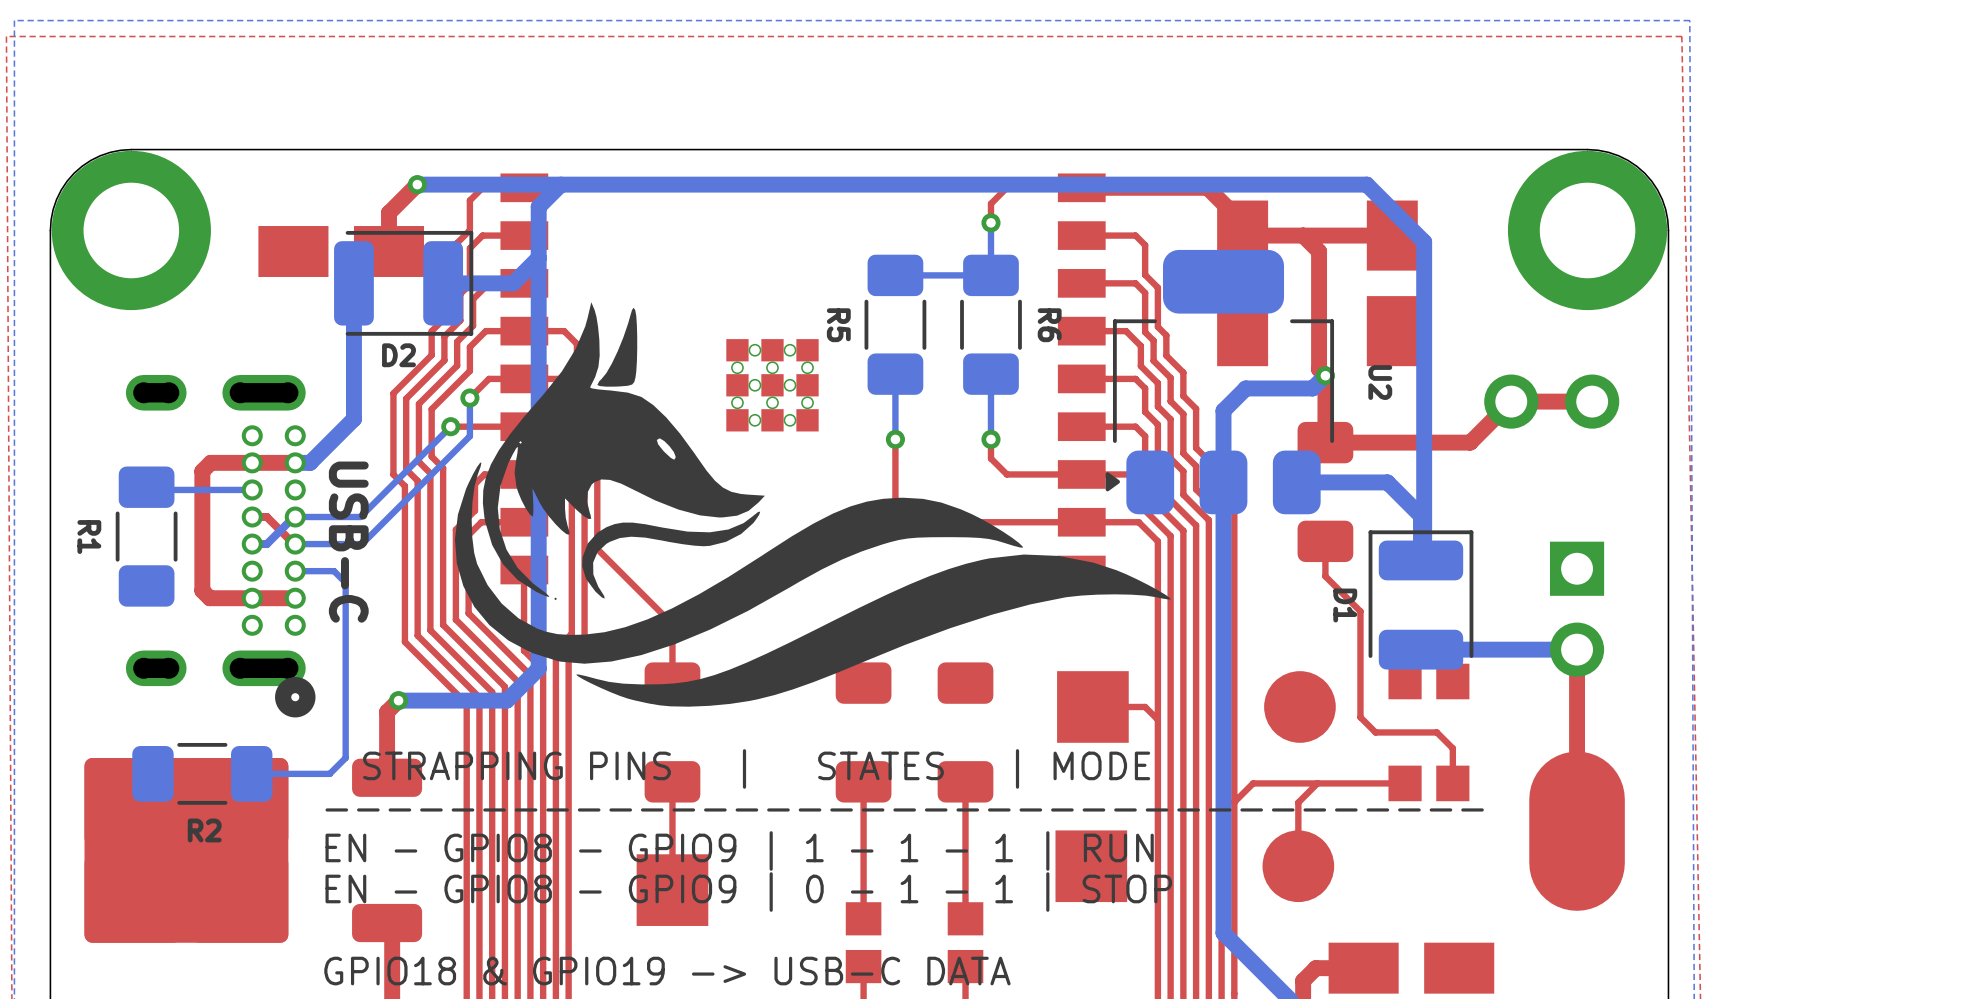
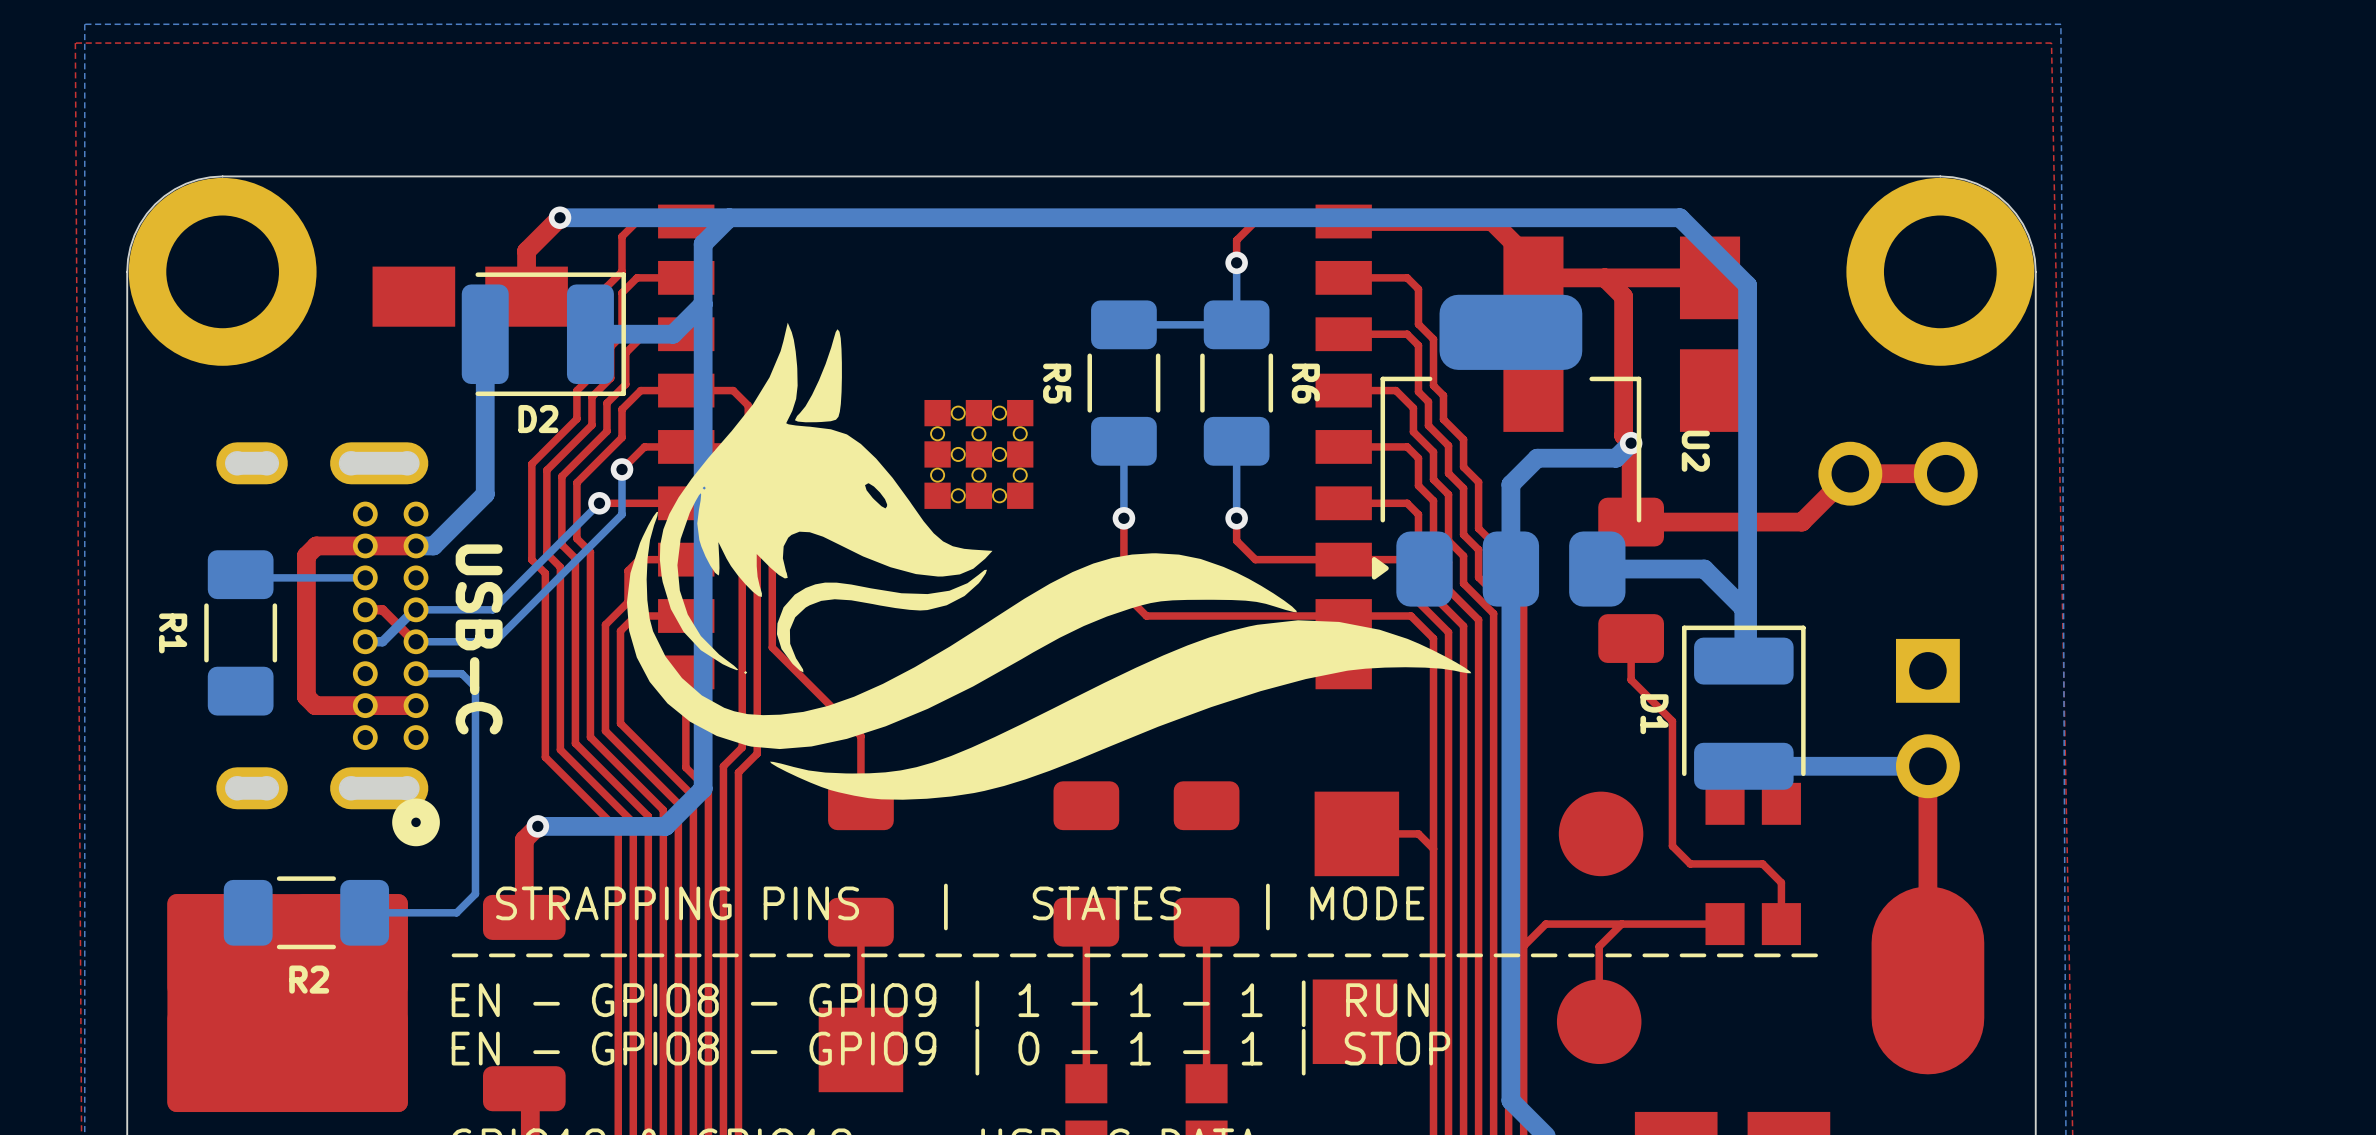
drawing position: (812, 504) -> (1049, 561)

